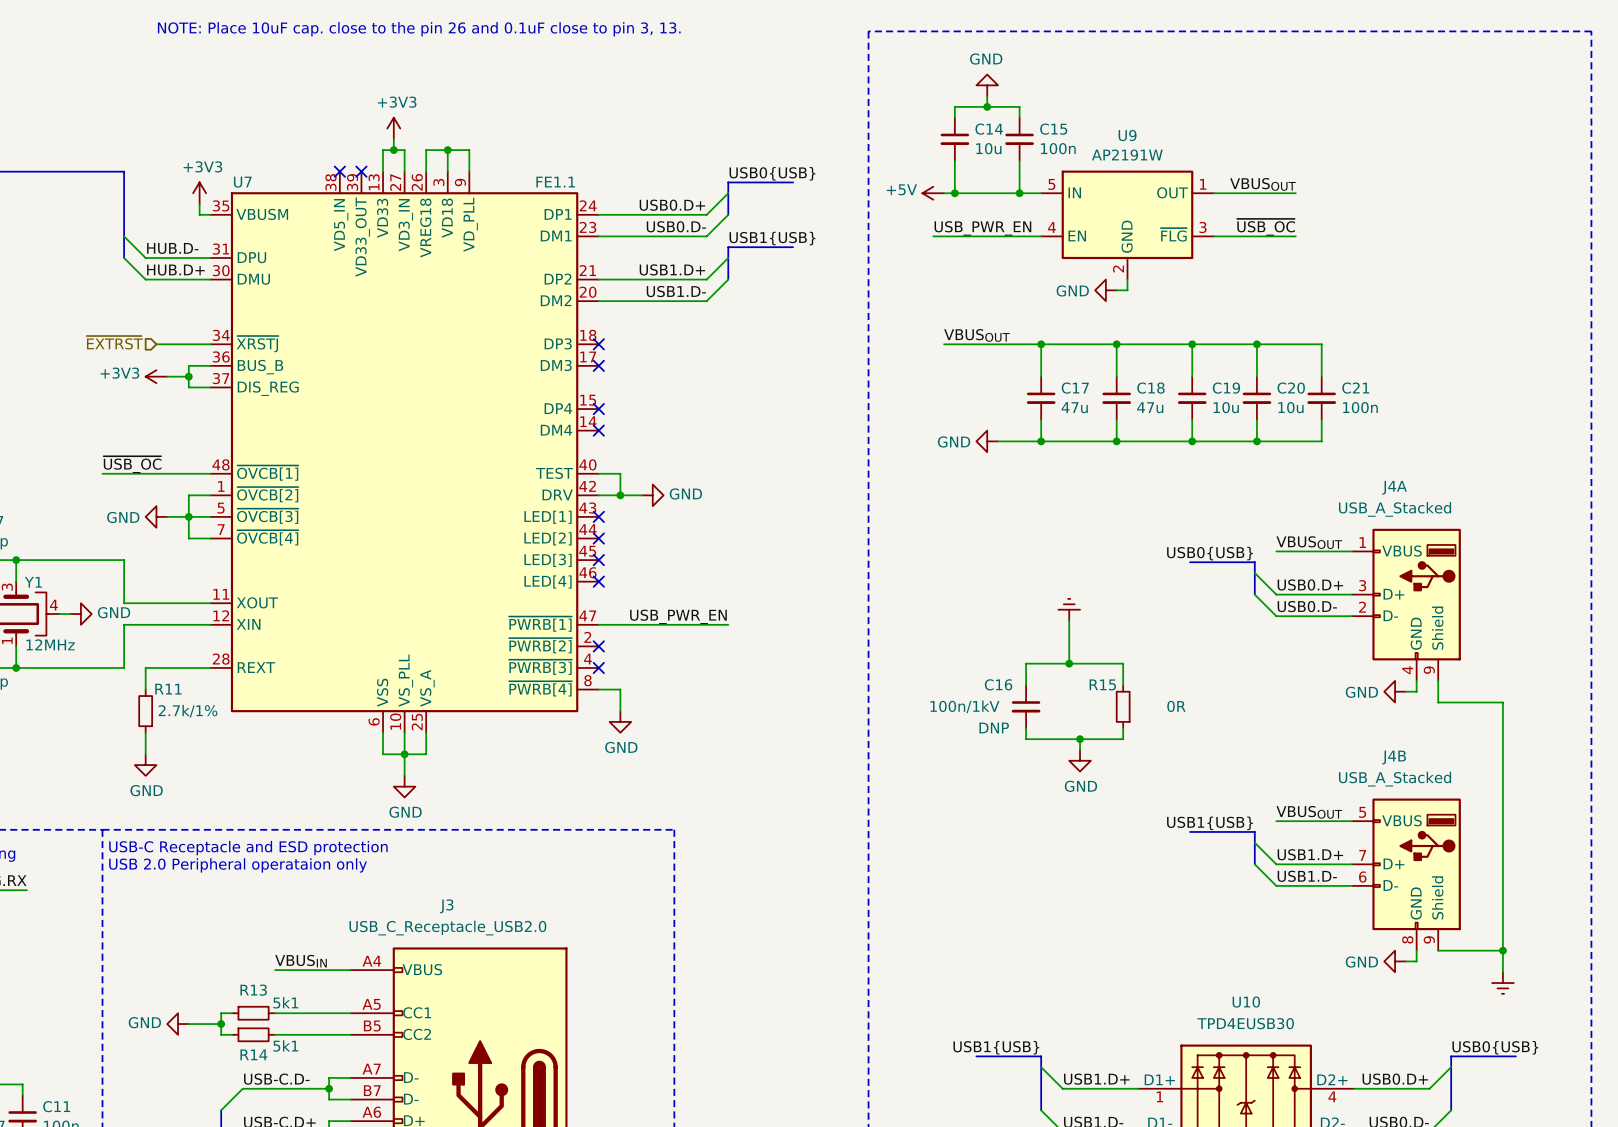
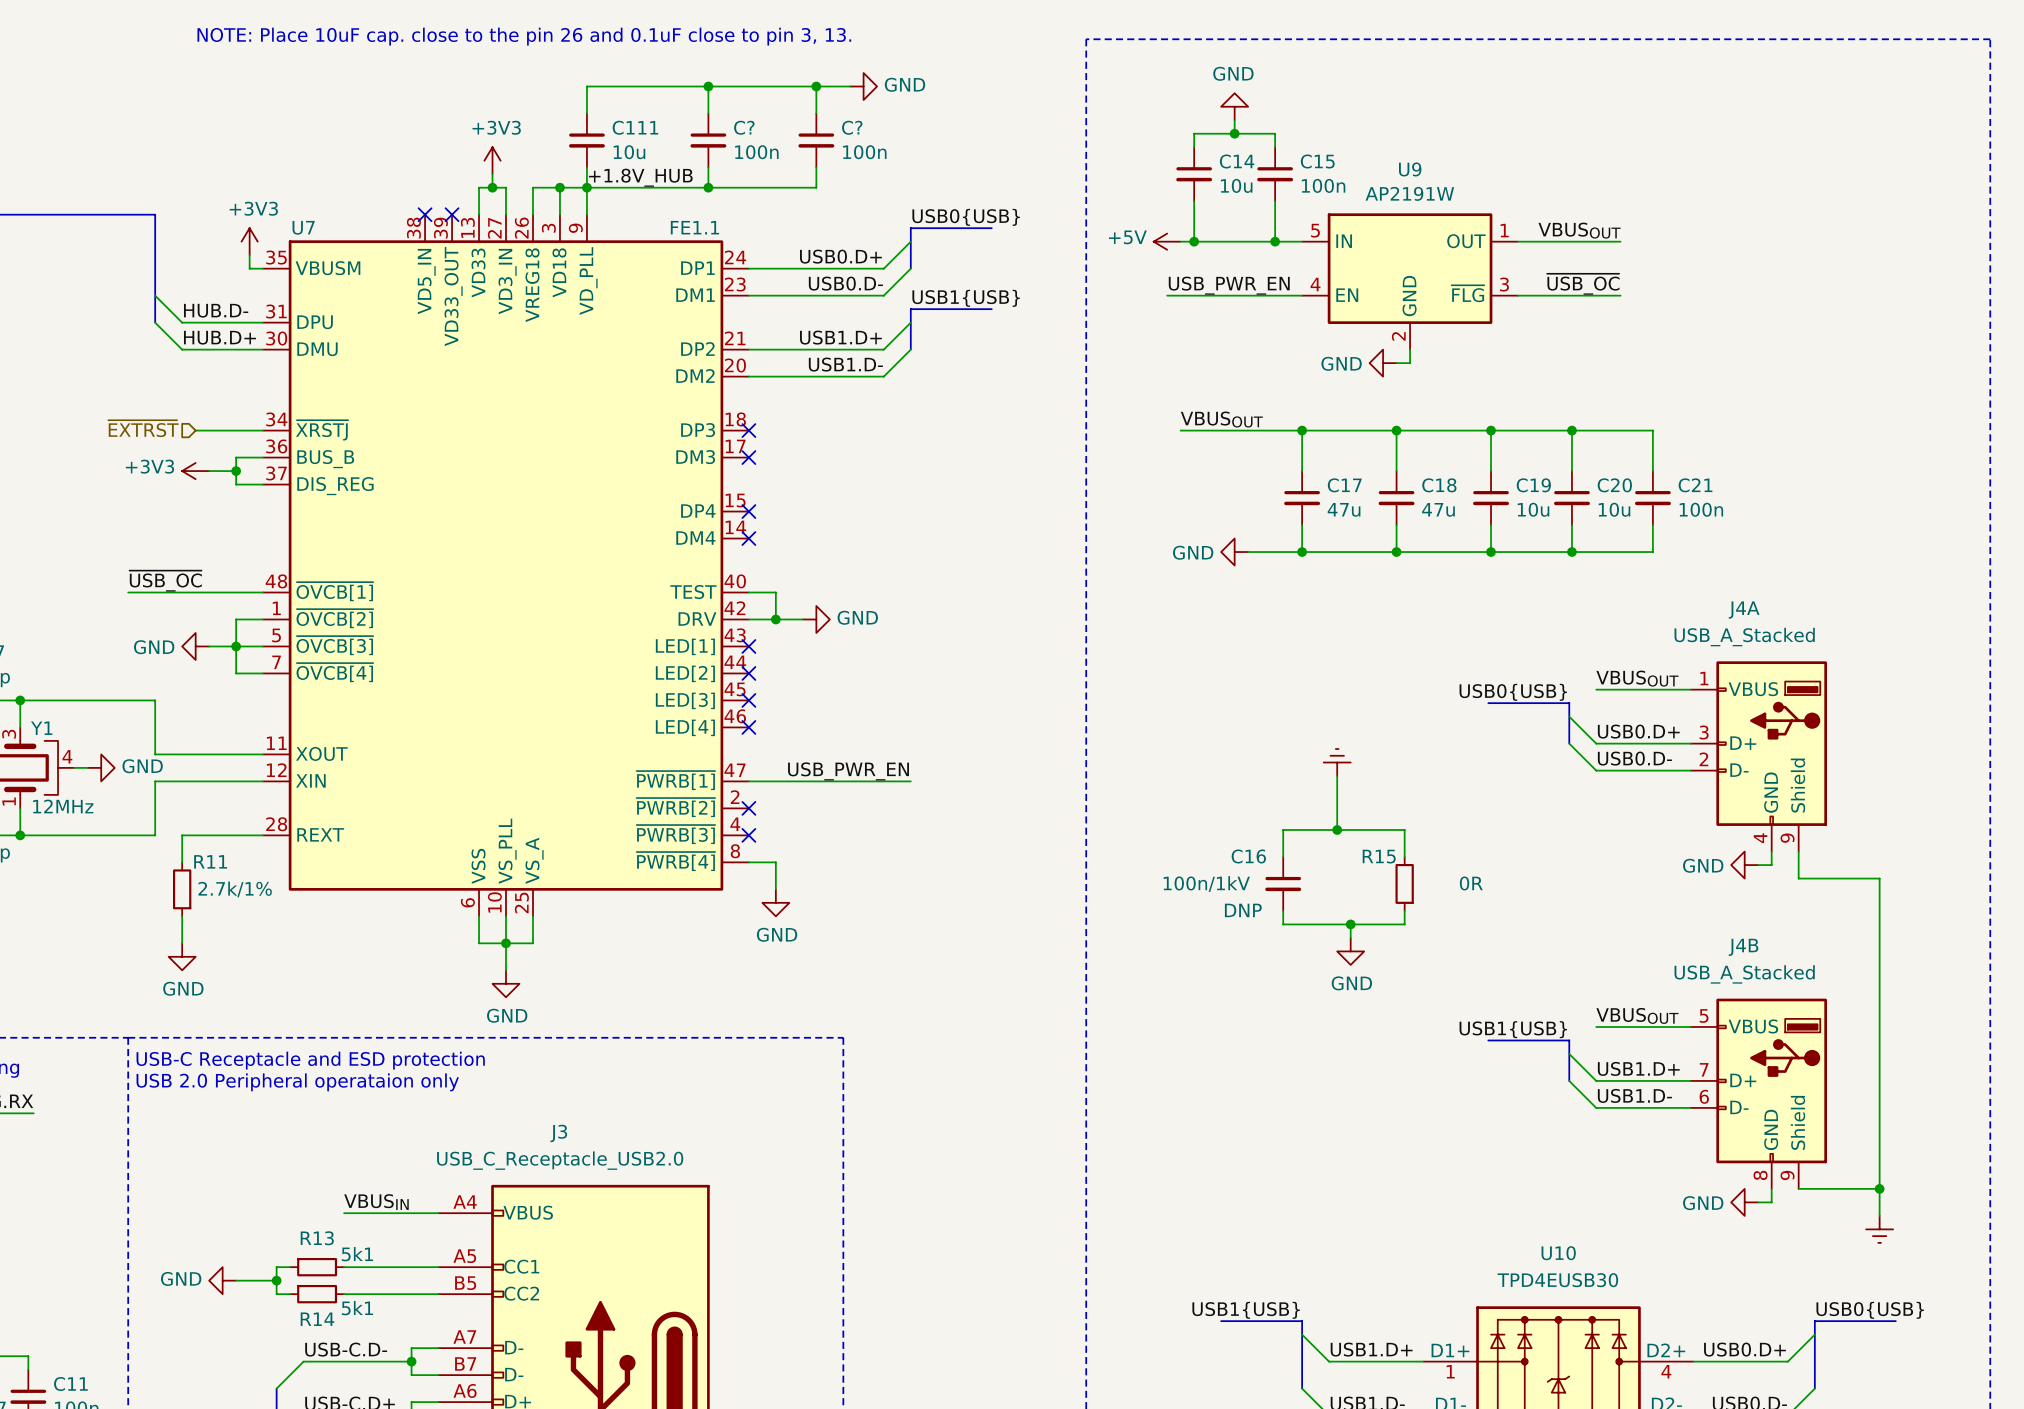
wire: none -> (708, 86) (708, 113)
junction: none -> (708, 86)
wire: none -> (816, 86) (816, 113)
junction: none -> (816, 86)
wire: none -> (850, 86) (586, 86) (586, 113)
power symbol: none -> GND (863, 86)
C111: none -> 10u (586, 140)
C?: none -> 100n (708, 140)
C?: none -> 100n (816, 140)
wire: none -> (586, 167) (586, 187) (816, 187) (816, 167)
wire: none -> (708, 167) (708, 187)
label: none -> +1.8V_HUB (640, 177)
junction: none -> (586, 187)
junction: none -> (708, 187)

